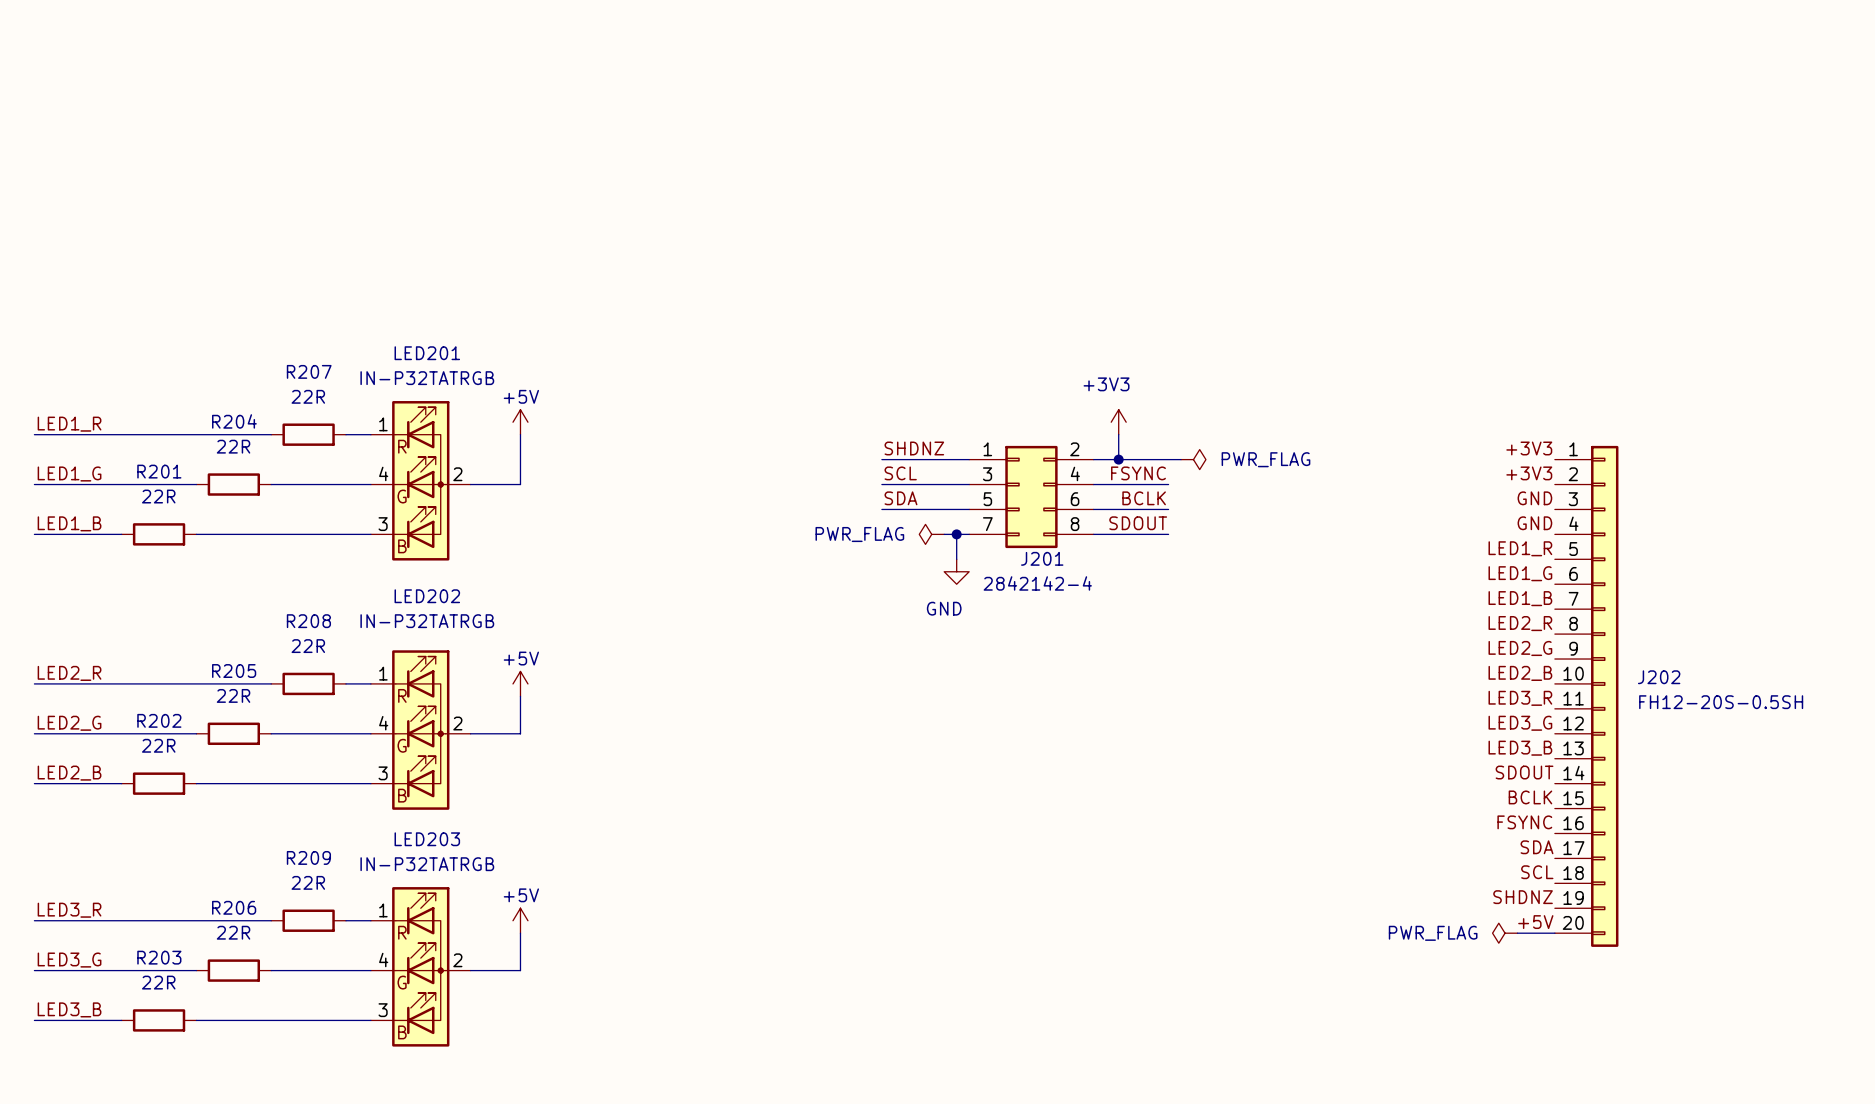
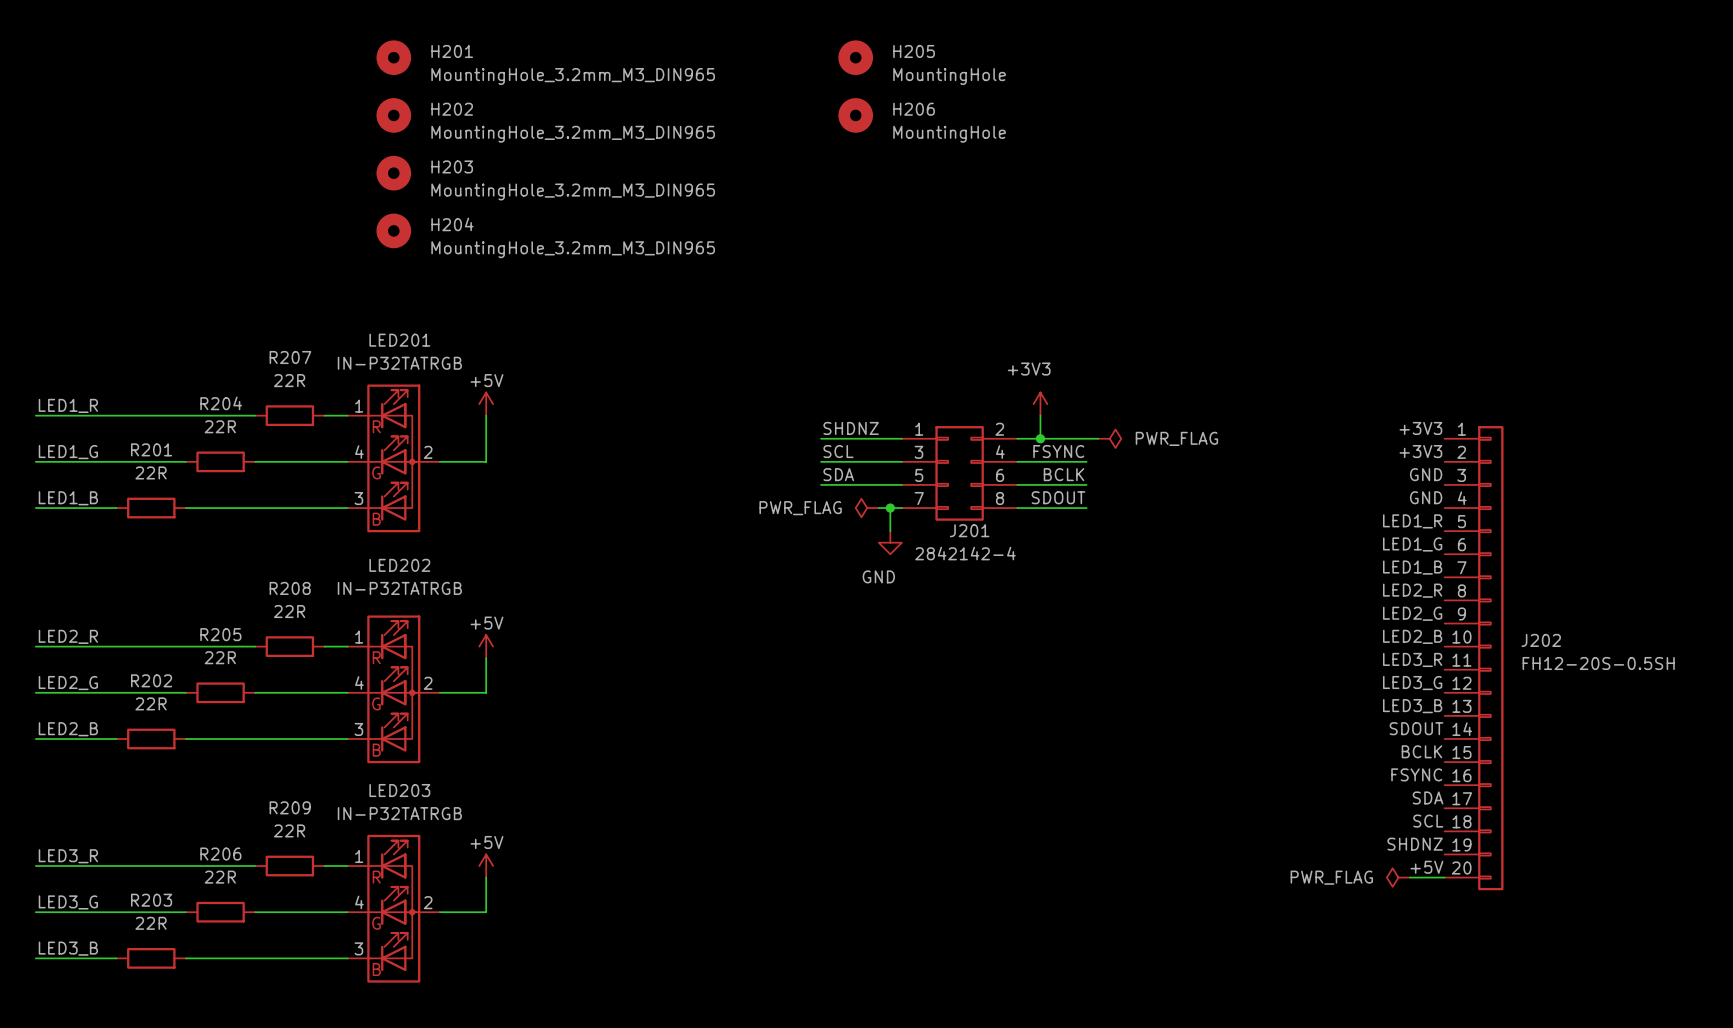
H201: none -> MountingHole_3.2mm_M3_DIN965 (393, 57)
H205: none -> MountingHole (855, 57)
H202: none -> MountingHole_3.2mm_M3_DIN965 (393, 115)
H206: none -> MountingHole (855, 115)
H203: none -> MountingHole_3.2mm_M3_DIN965 (393, 173)
H204: none -> MountingHole_3.2mm_M3_DIN965 (393, 230)

